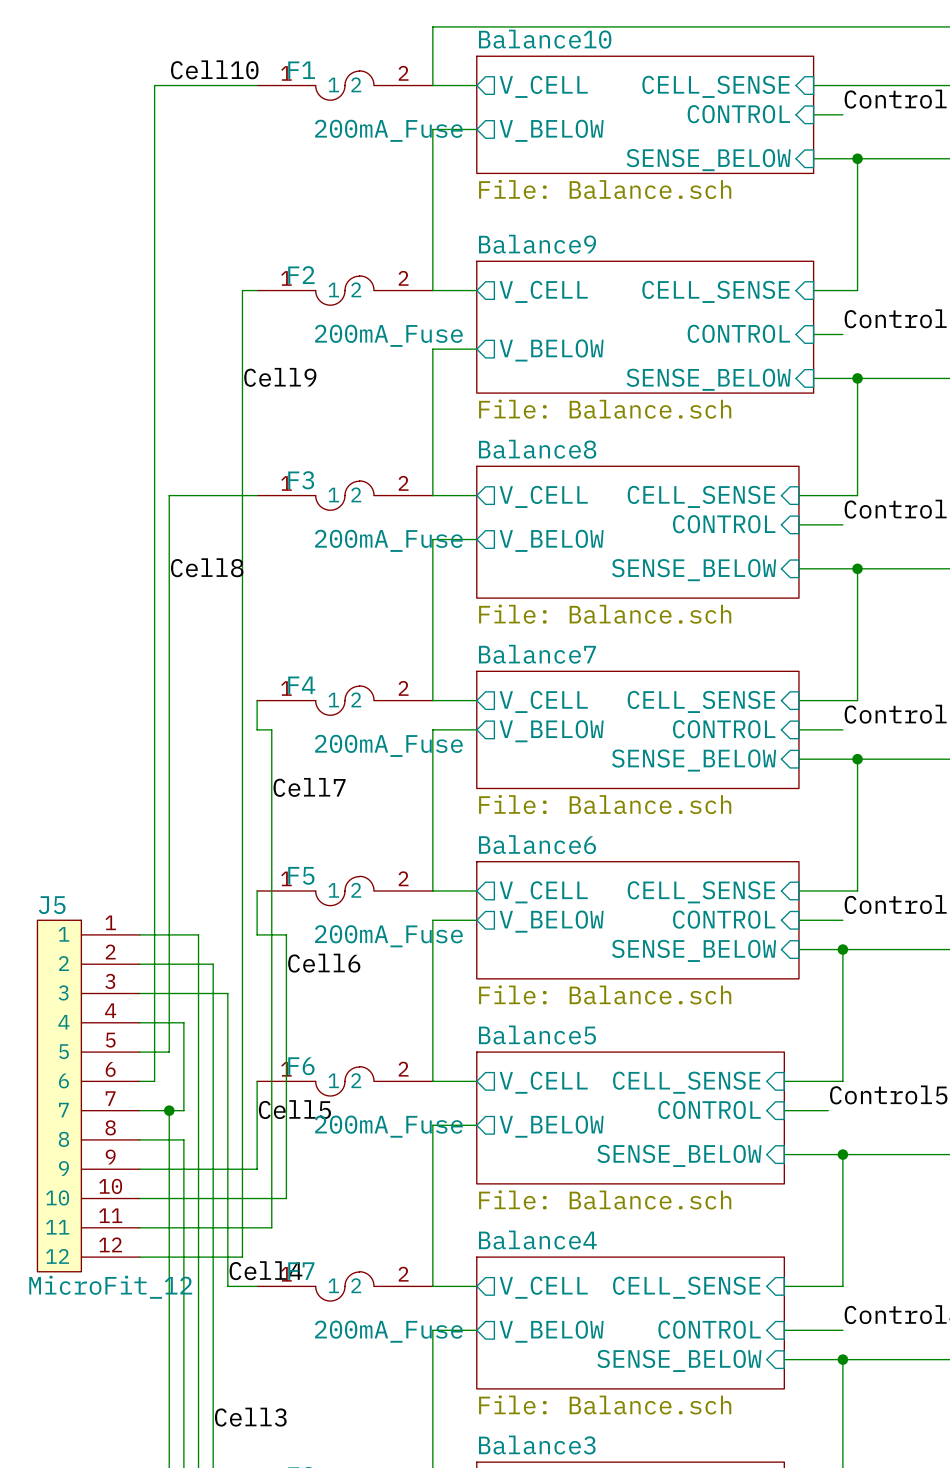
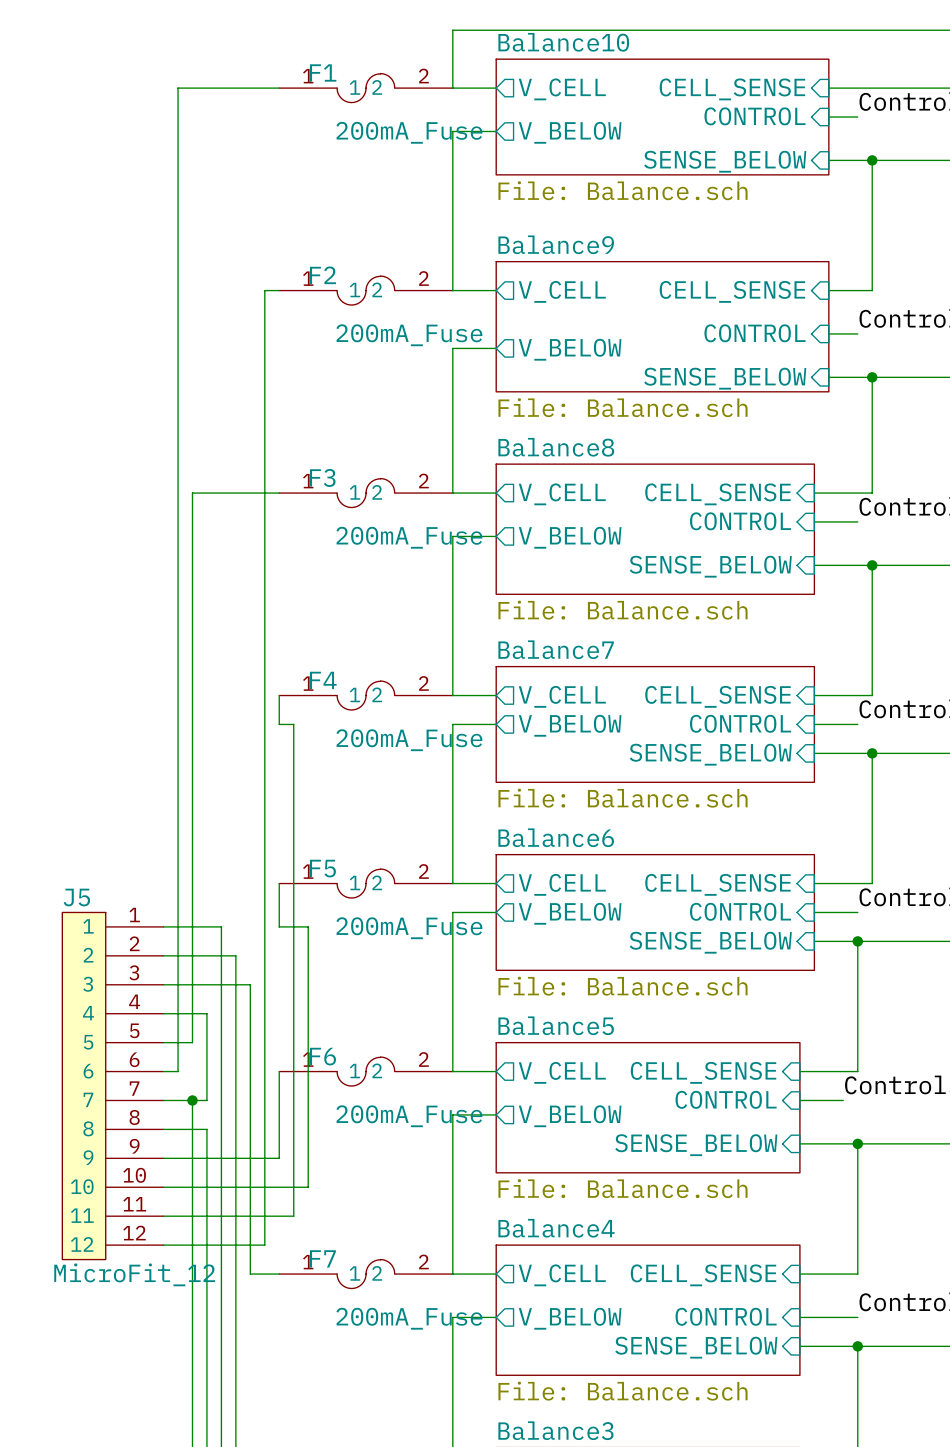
label: Cell10 (214, 69) -> none
label: Cell9 (280, 377) -> none
label: Cell8 (207, 567) -> none
label: Cell7 (309, 787) -> none
label: Cell6 (324, 963) -> none
label: Cell5 (294, 1109) -> none
label: Cell4 (265, 1270) -> none
label: Cell3 (250, 1417) -> none

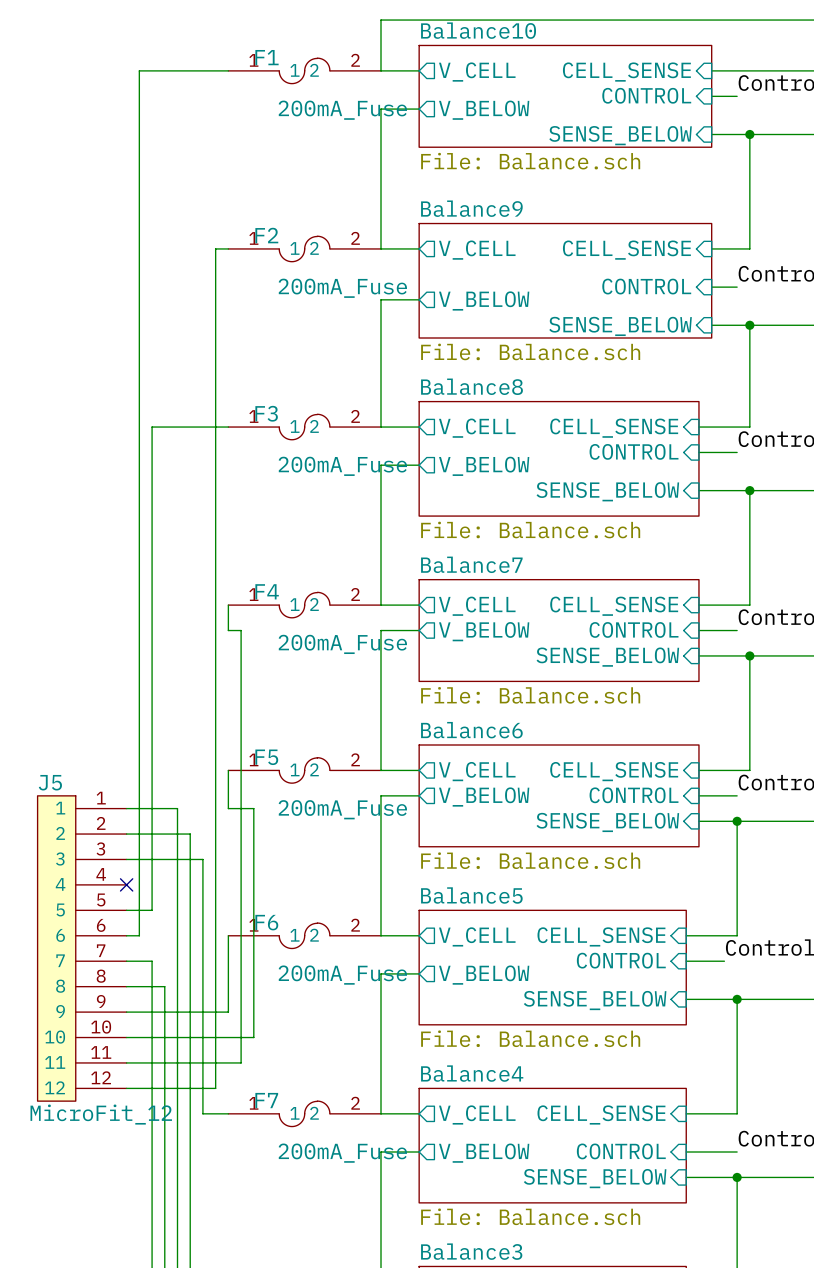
wire: (163, 1013) (206, 1013) (206, 1100) (192, 1100) -> none
no-connect mark: none -> (126, 884)
junction: (192, 1100) -> none

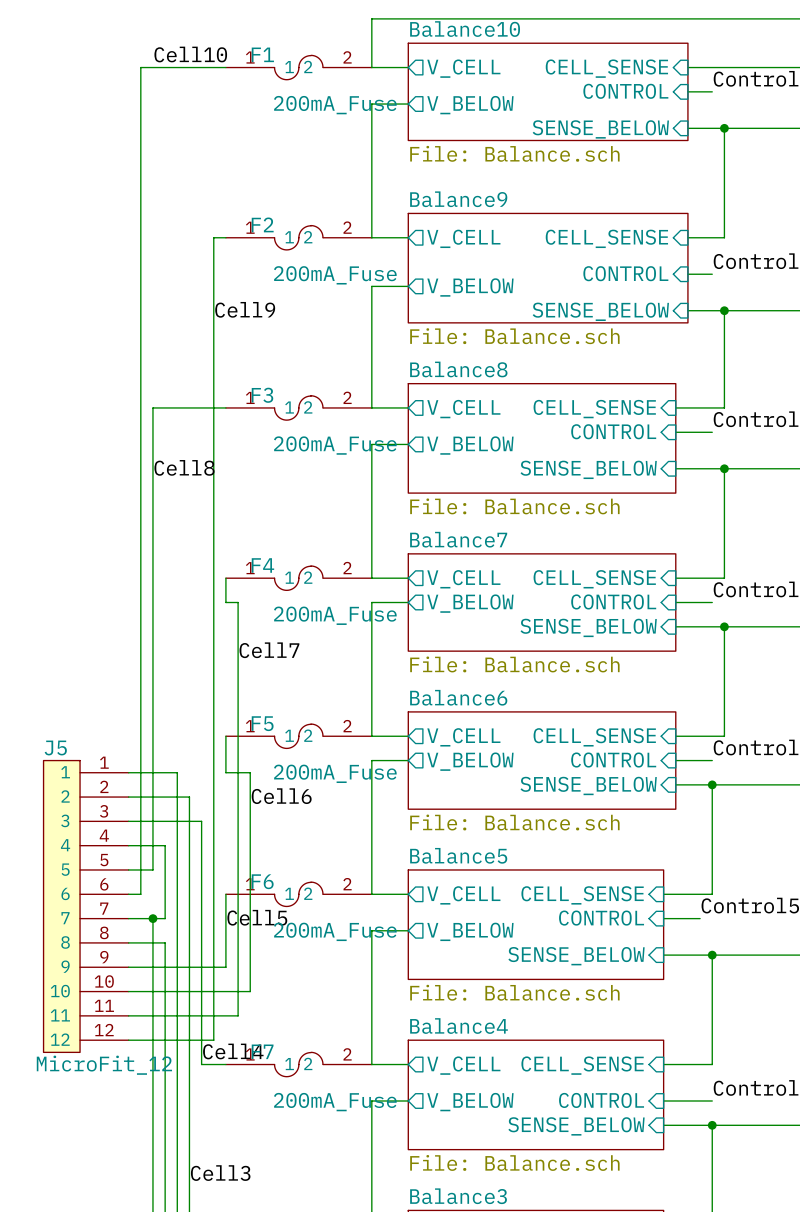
label: none -> Cell10 (190, 54)
label: none -> Cell9 (245, 309)
label: none -> Cell8 (184, 467)
label: none -> Cell7 (269, 650)
label: none -> Cell6 (281, 796)
wire: none -> (128, 845) (165, 845) (165, 918) (152, 918)
no-connect mark: (126, 884) -> none
label: none -> Cell5 (257, 917)
junction: none -> (152, 918)
label: none -> Cell4 (233, 1051)
label: none -> Cell3 (220, 1173)

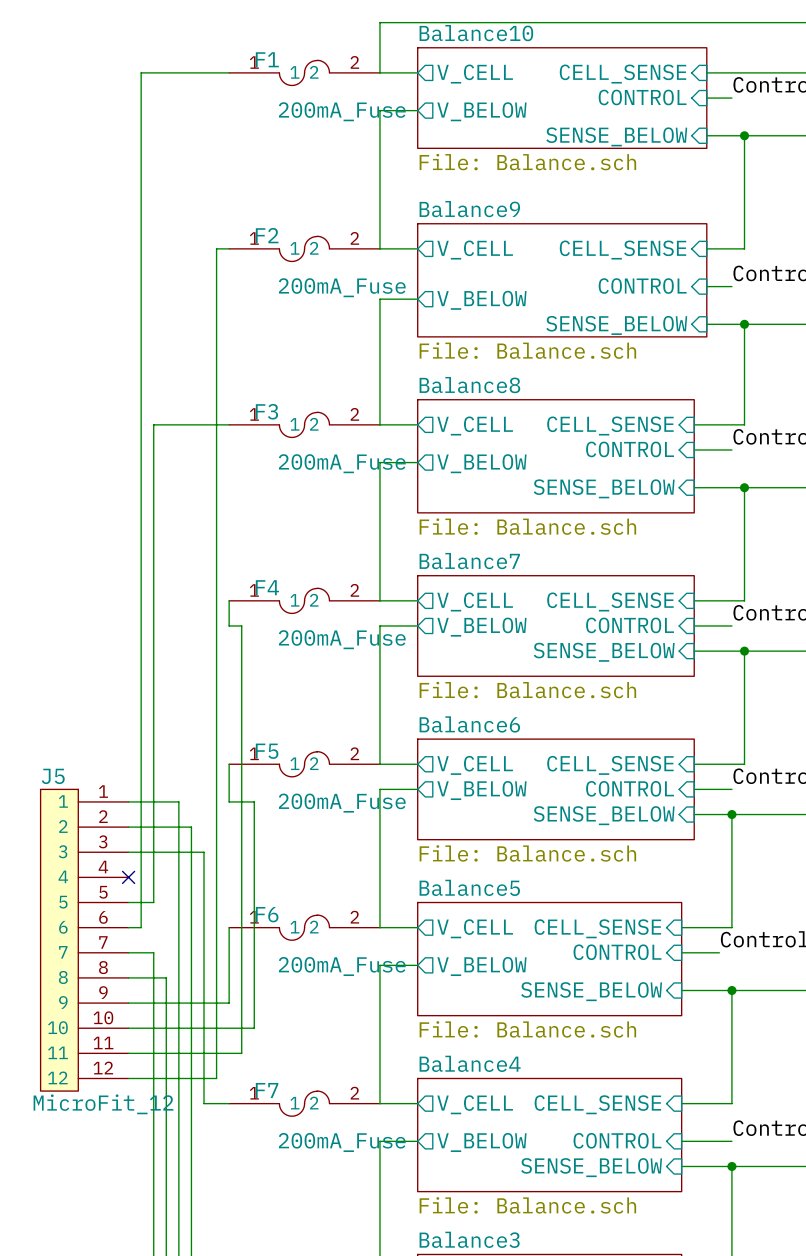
label: Cell10 (190, 54) -> none
label: Cell9 (245, 309) -> none
label: Cell8 (184, 467) -> none
label: Cell7 (269, 650) -> none
label: Cell6 (281, 796) -> none
wire: (128, 845) (165, 845) (165, 918) (152, 918) -> none
no-connect mark: none -> (128, 877)
label: Cell5 (257, 917) -> none
junction: (152, 918) -> none
label: Cell4 (233, 1051) -> none
label: Cell3 (220, 1173) -> none

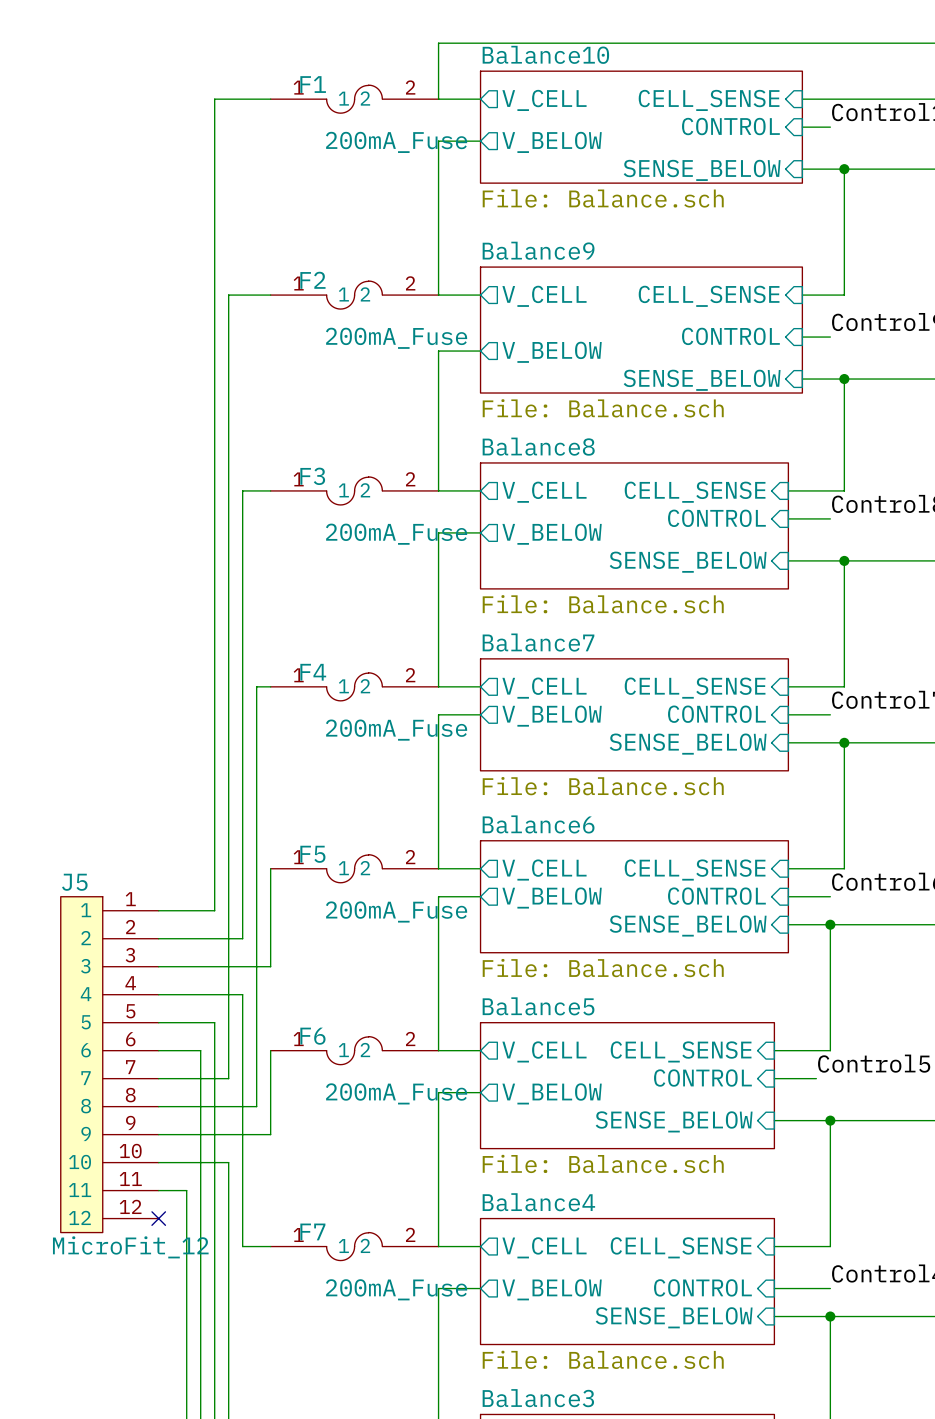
wire: (178, 72) (141, 72) (141, 927) -> (214, 99) (214, 910)
wire: (216, 248) (216, 600) -> (256, 295) (228, 295) (228, 938) (242, 938) (242, 490)
wire: (204, 424) (153, 424) (153, 902) -> none
wire: (229, 600) (229, 625) (241, 625) (241, 1053) (153, 1053) (153, 952) -> (270, 686) (256, 686)
wire: (178, 801) (178, 902) -> (186, 1022) (214, 1022)
wire: (229, 801) (254, 801) (254, 1028) (191, 1028) (191, 952) -> (186, 1078) (228, 1078)
wire: (204, 852) (204, 877) -> (242, 966) (270, 966) (270, 910)
wire: none -> (158, 994) (242, 994)
no-connect mark: (128, 877) -> none
wire: (216, 977) (216, 1078) (128, 1078) -> (256, 1106) (200, 1106) (200, 1050) (172, 1050)
no-connect mark: none -> (158, 1218)

